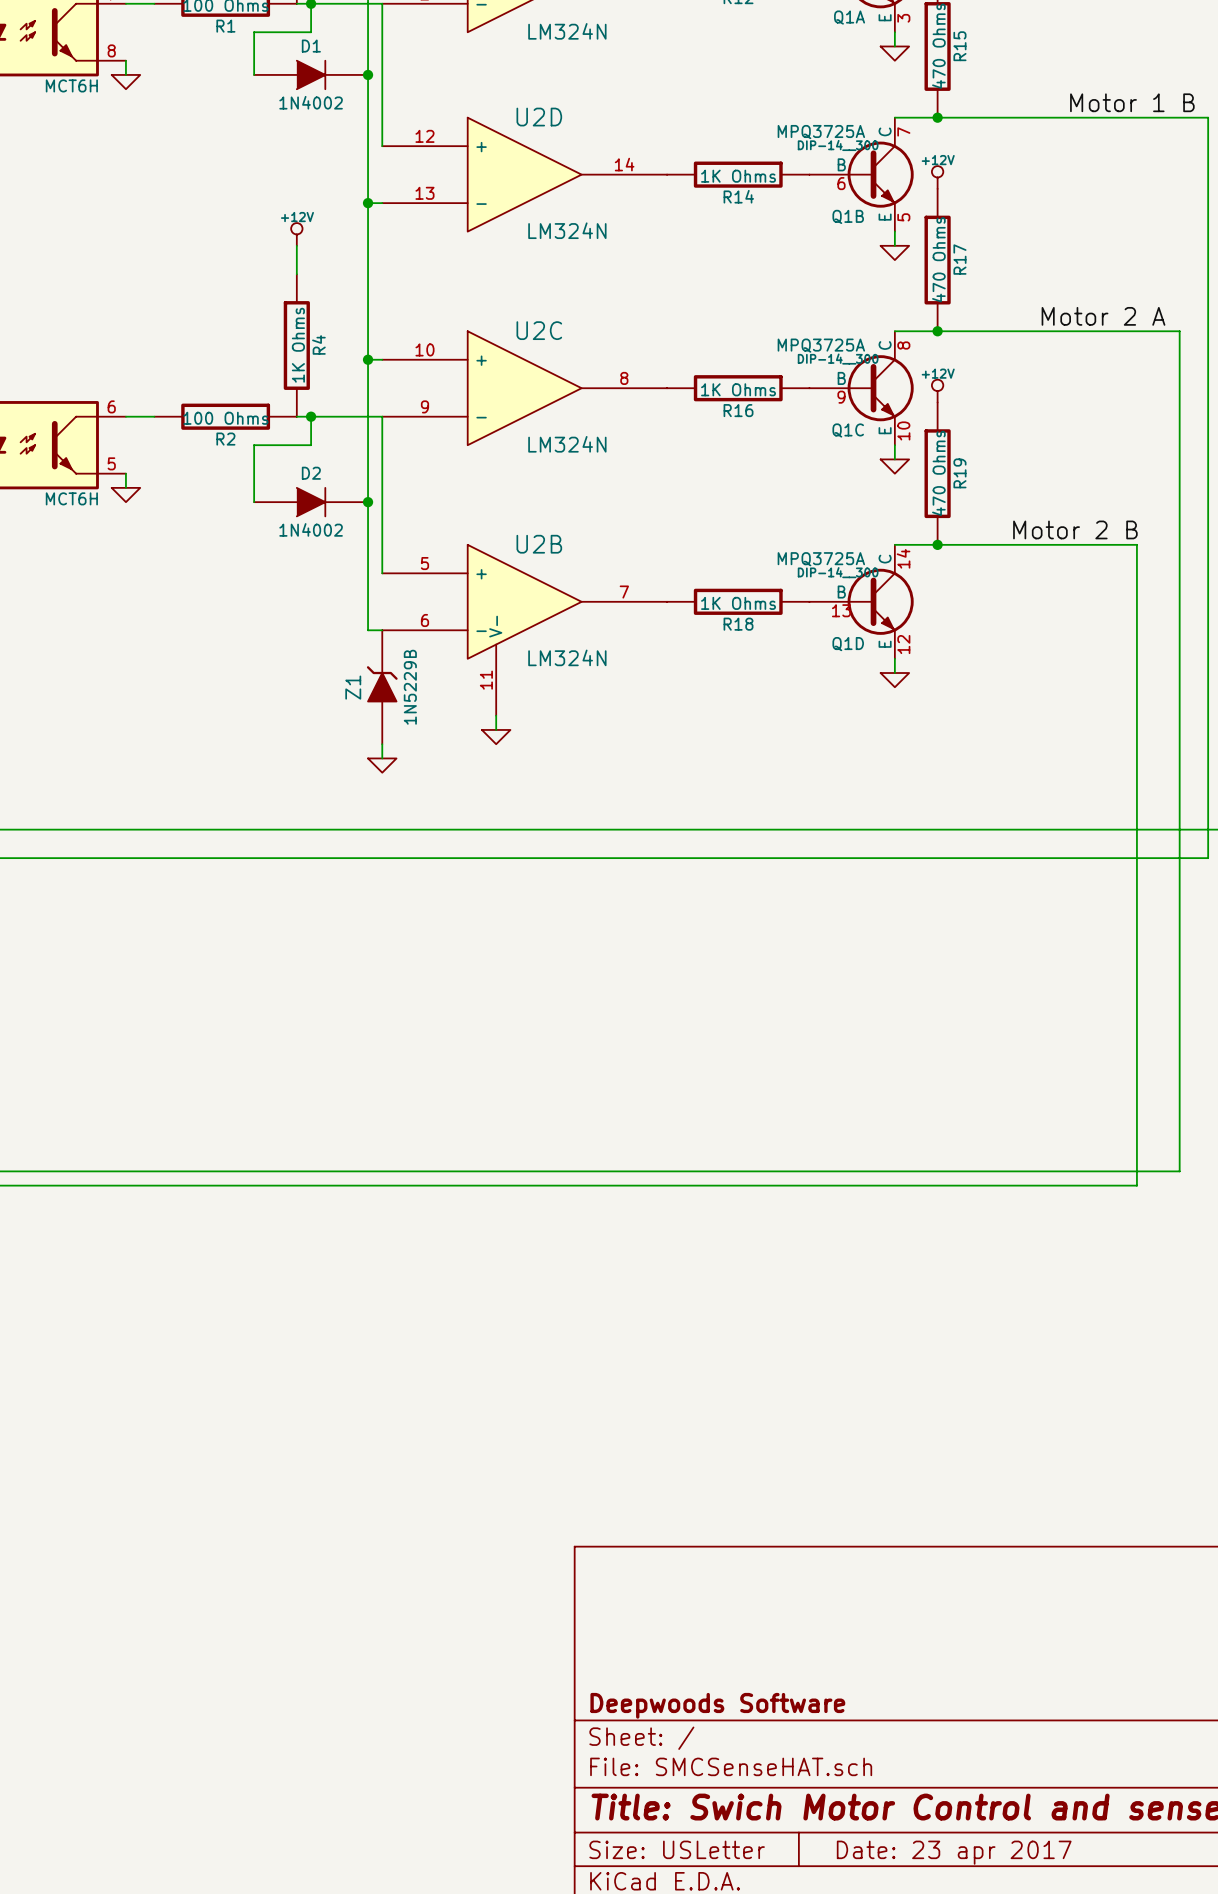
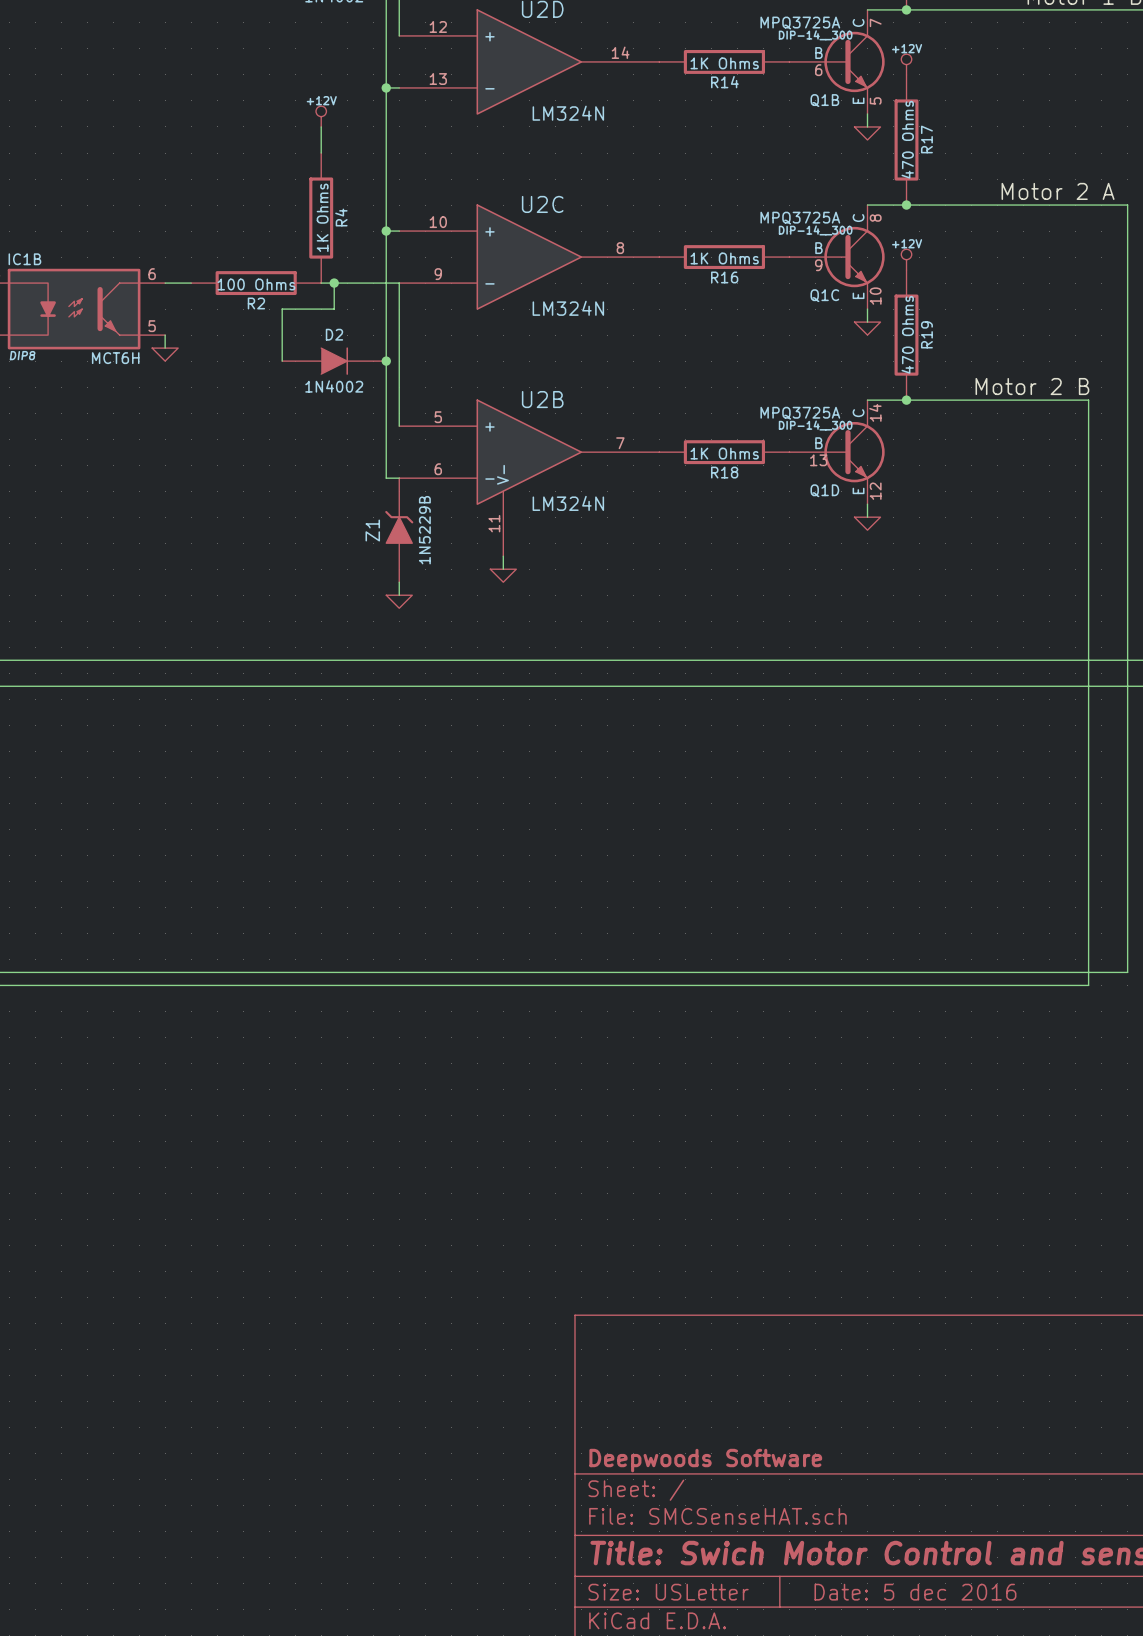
title block: Date: 23 apr 2017 (954, 1852) -> Date: 5 dec 2016 (915, 1592)

